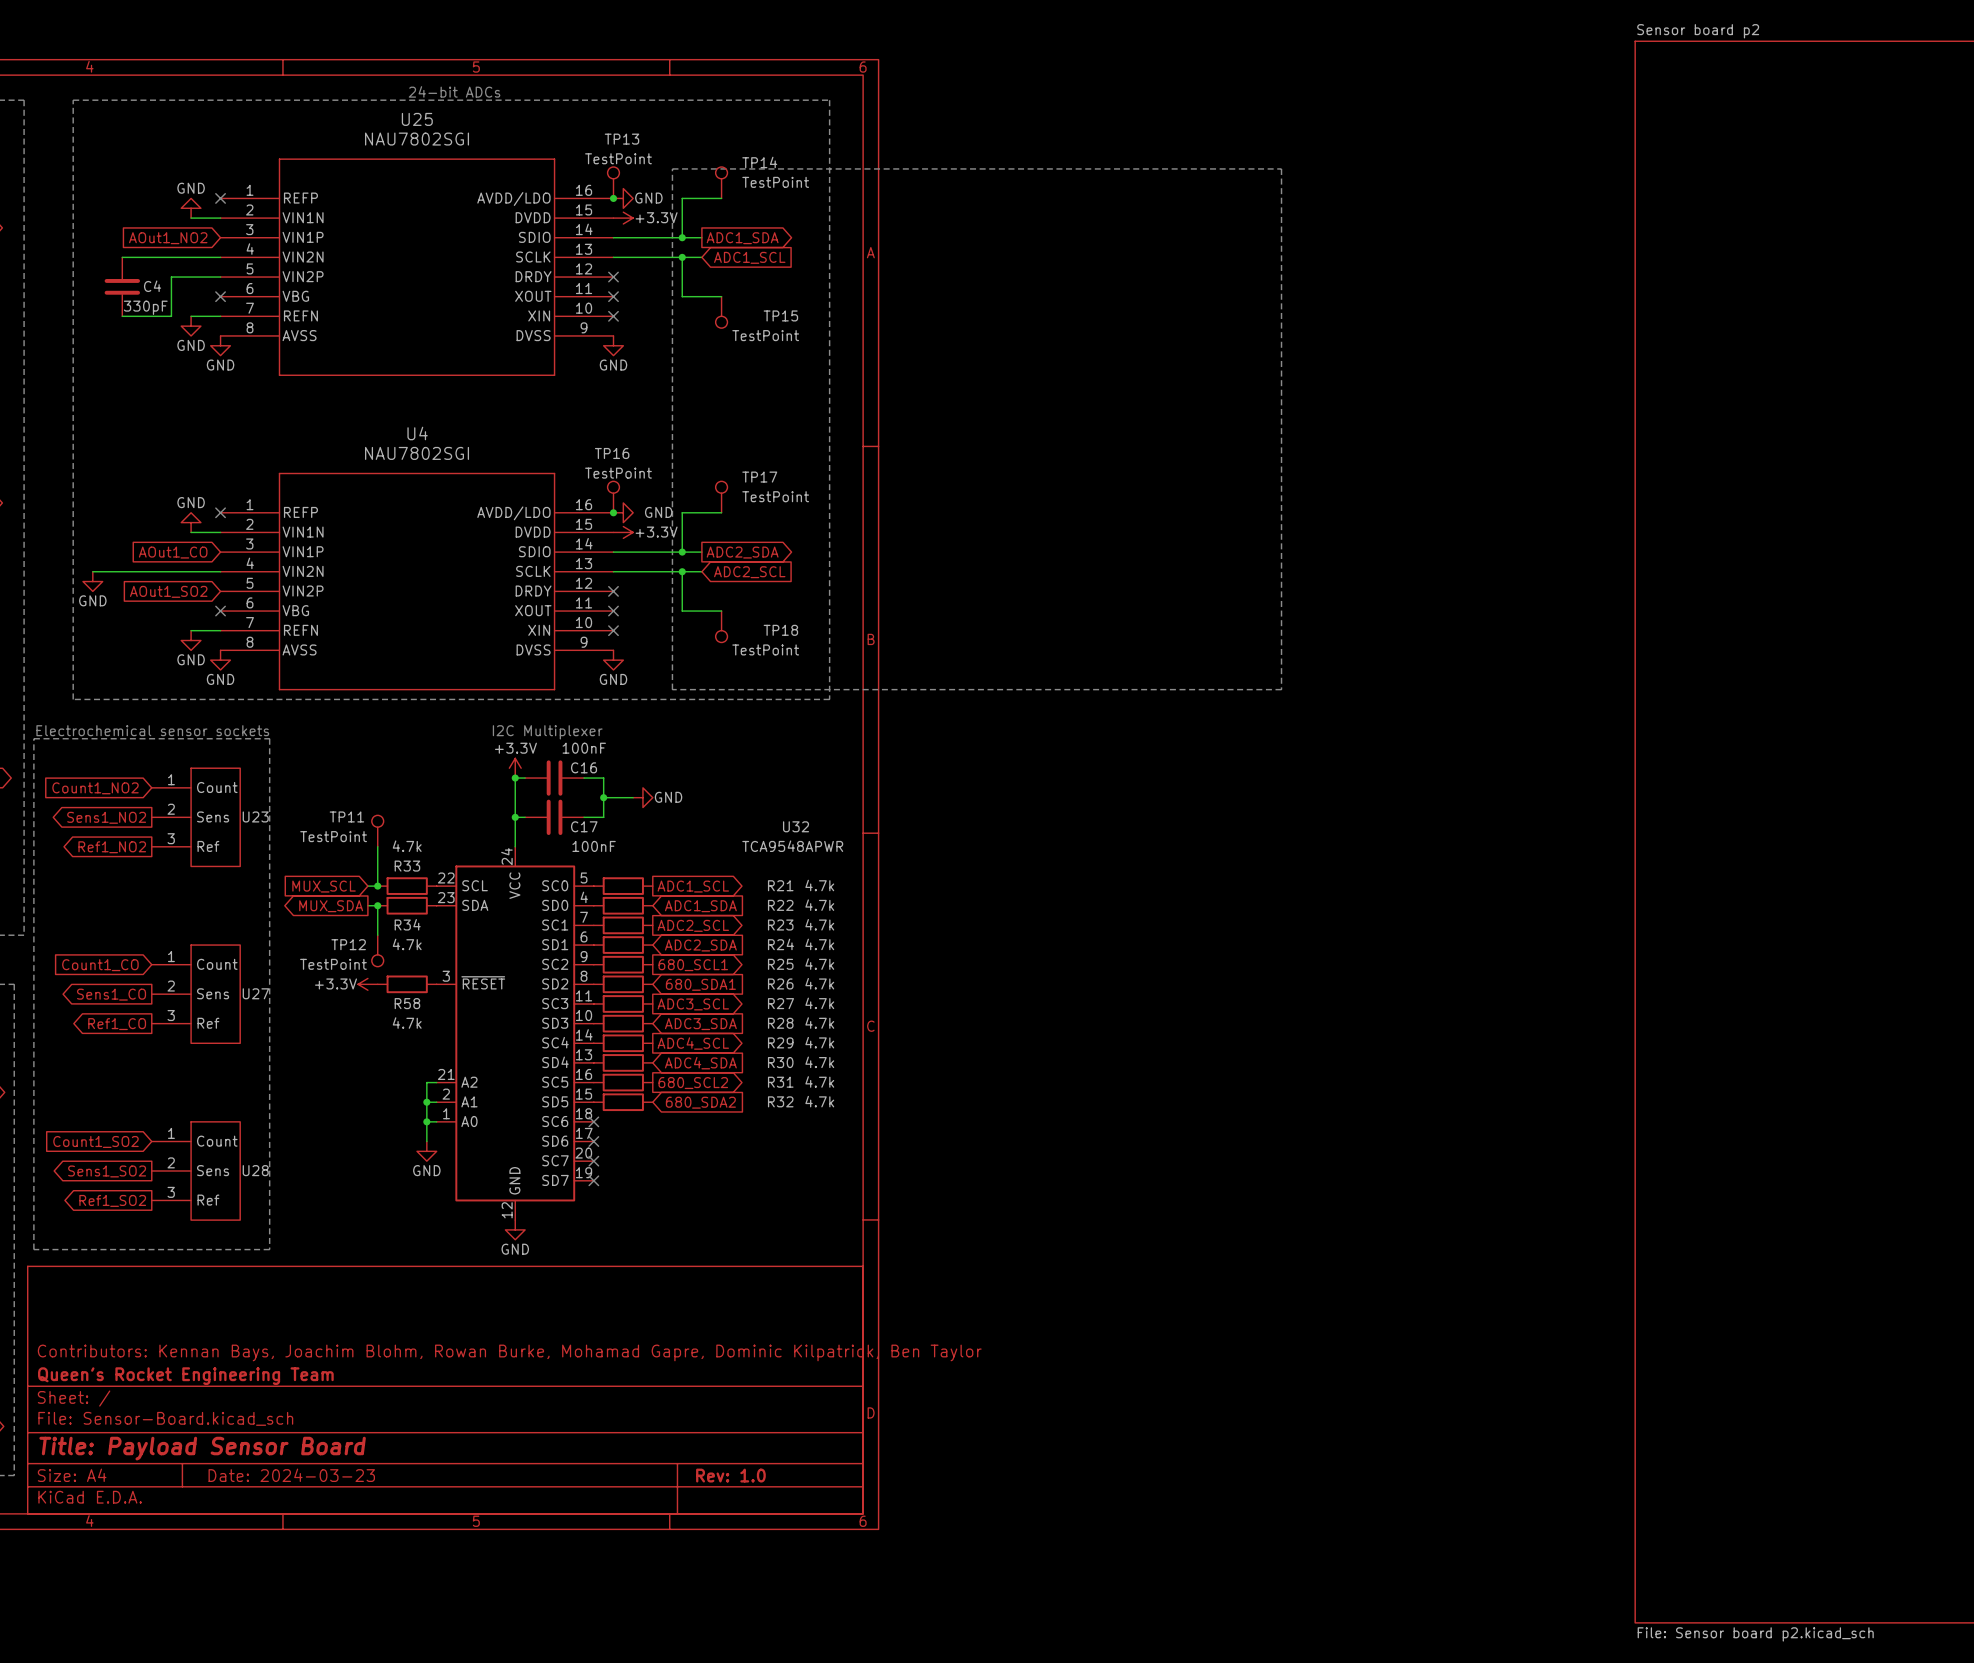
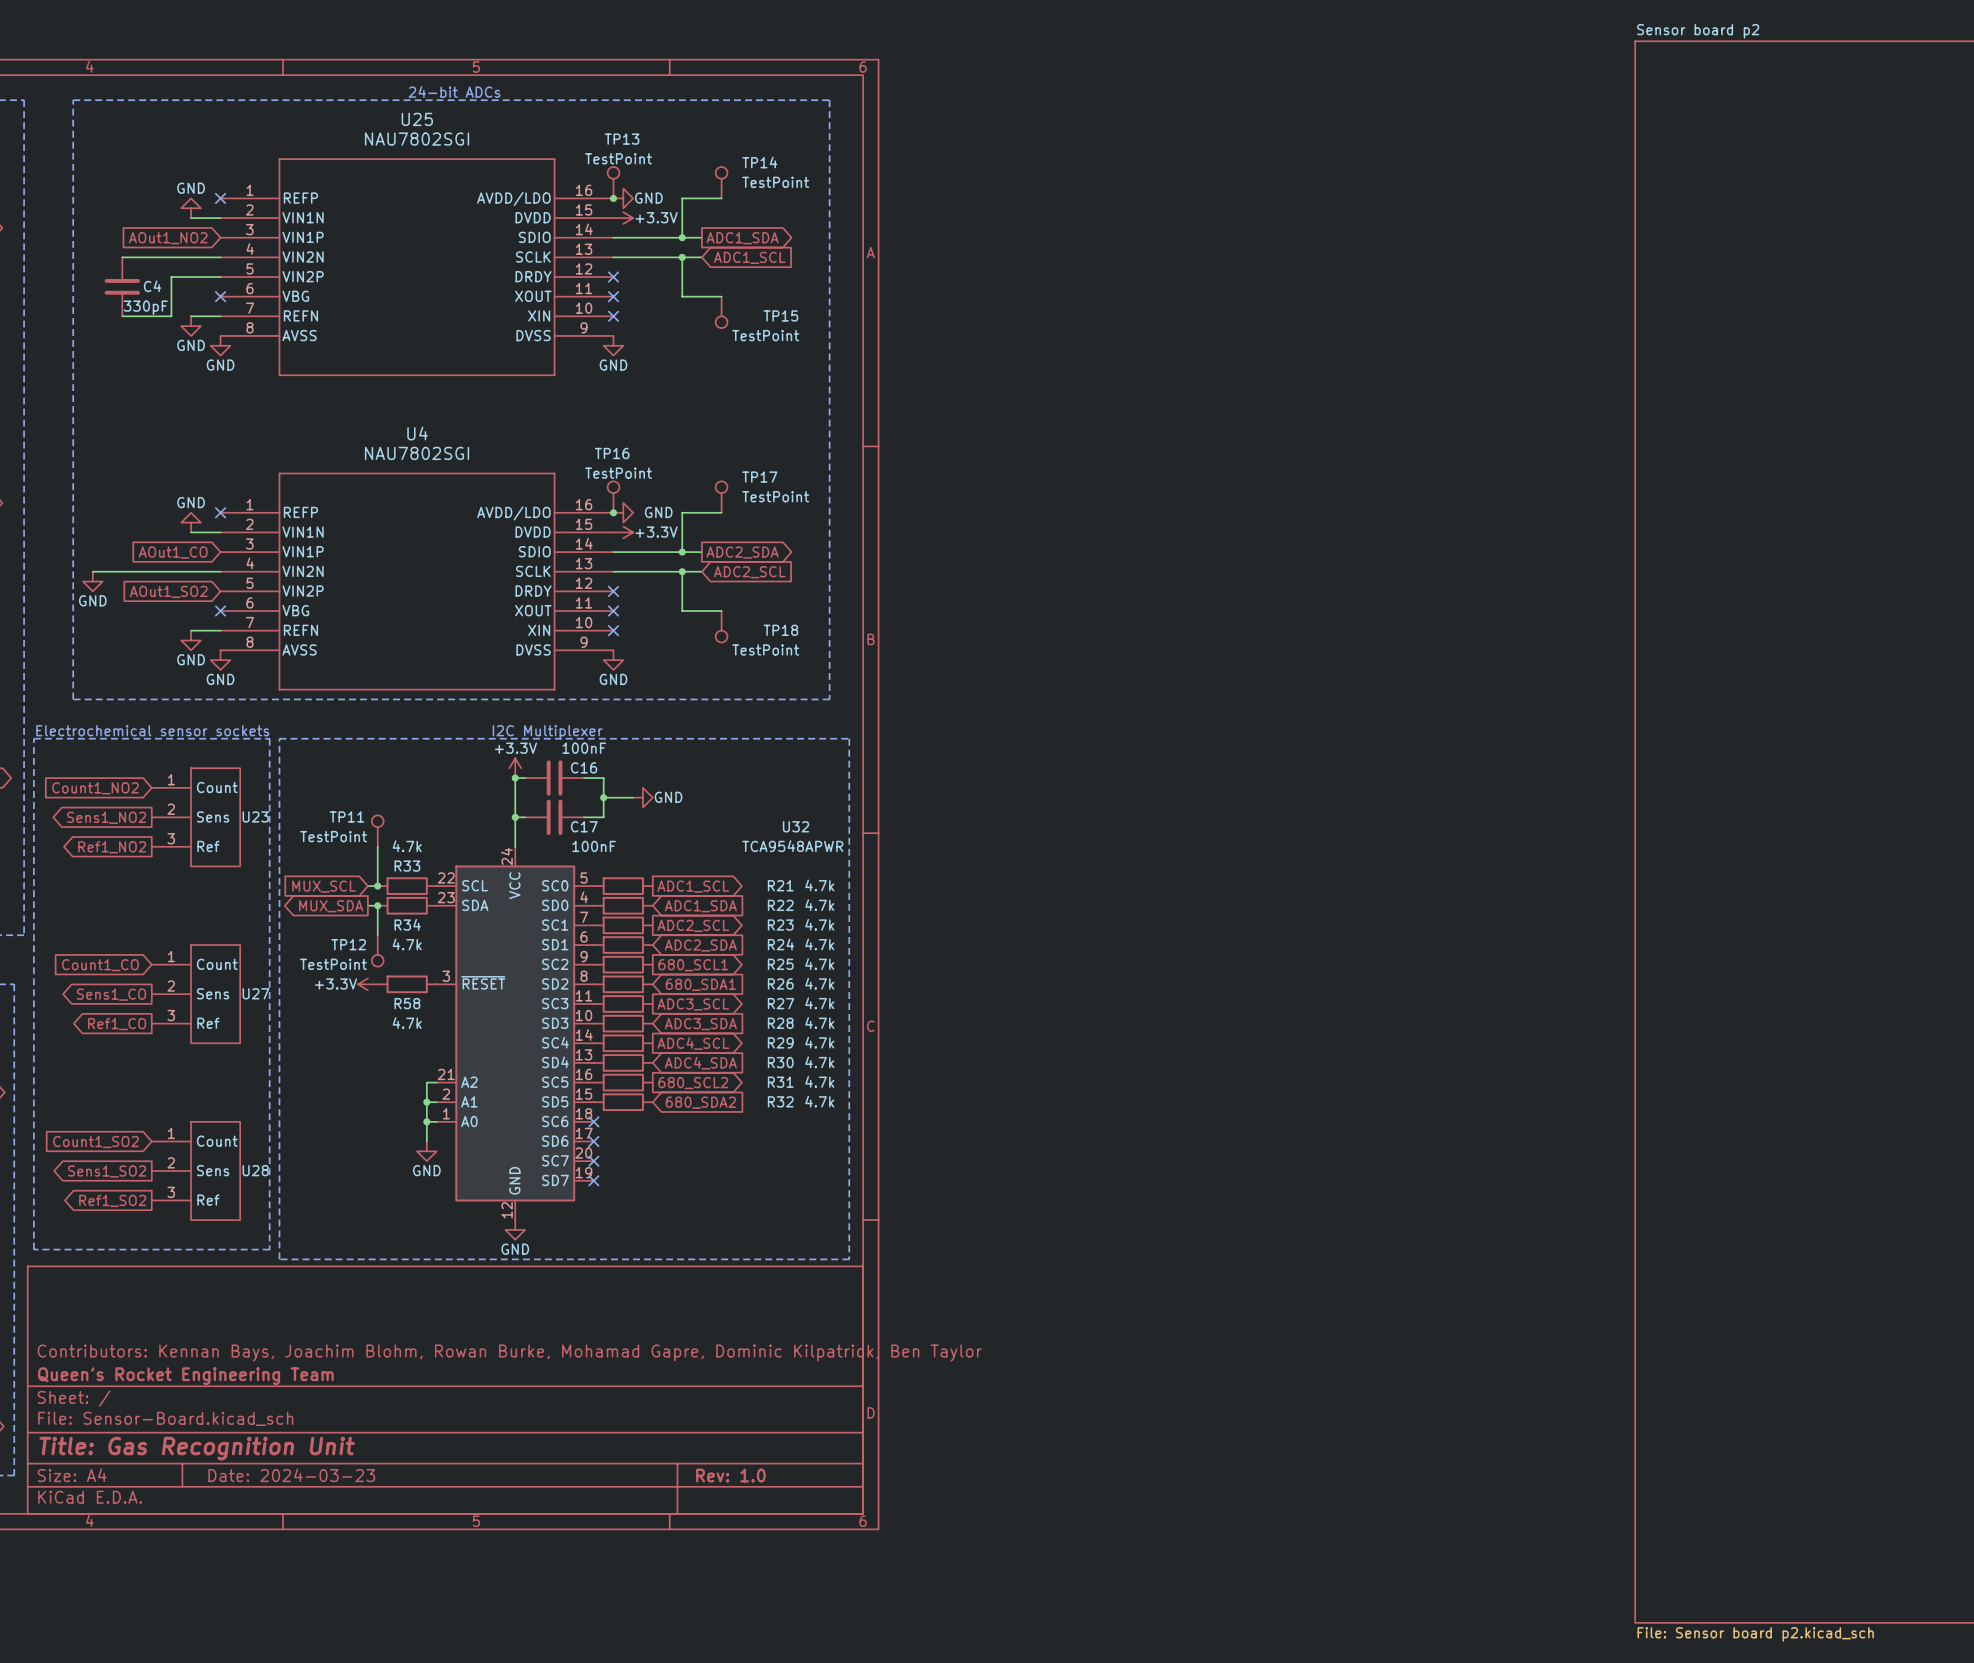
line: (672, 168) (1281, 168) (1281, 689) (672, 689) (672, 168) -> none
line: none -> (279, 738) (849, 738) (849, 1259) (279, 1259) (279, 738)
title block: Title: Payload Sensor Board (202, 1448) -> Title: Gas Recognition Unit (197, 1448)

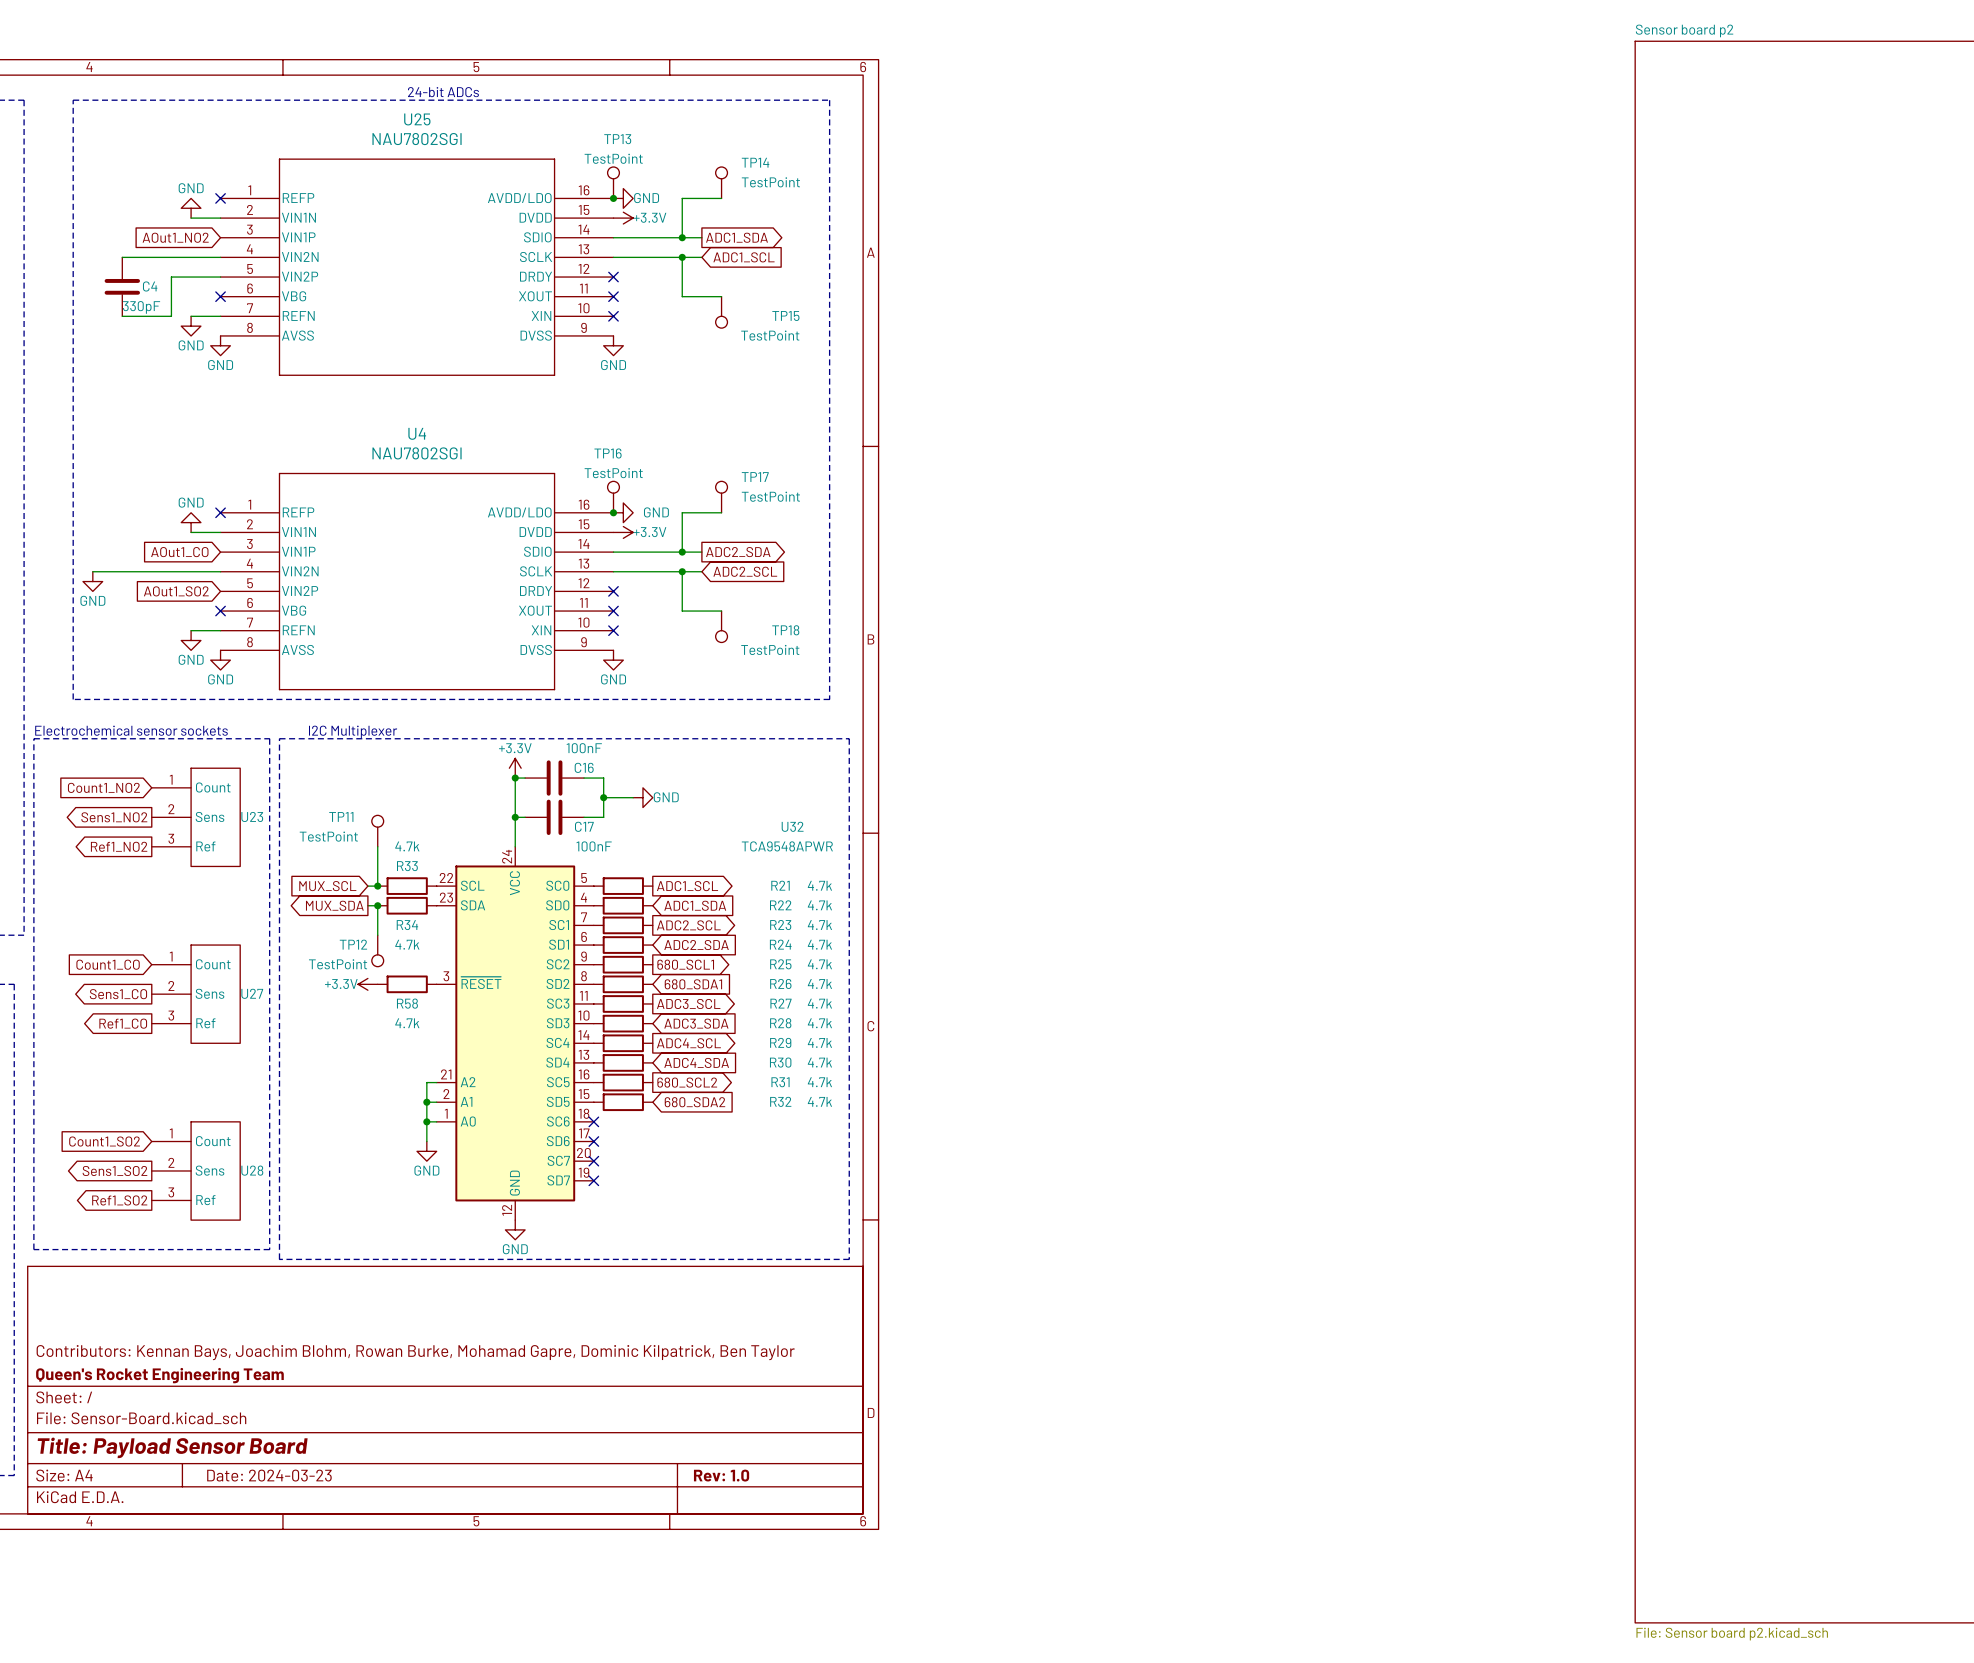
text: none -> I2C Multiplexer (353, 731)
text: I2C Multiplexer (547, 732) -> none
title block: Title: Gas Recognition Unit (197, 1448) -> Title: Payload Sensor Board (172, 1447)

